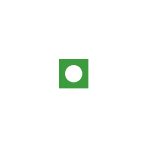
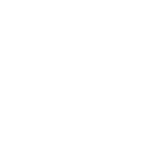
part: (73, 73) -> none

